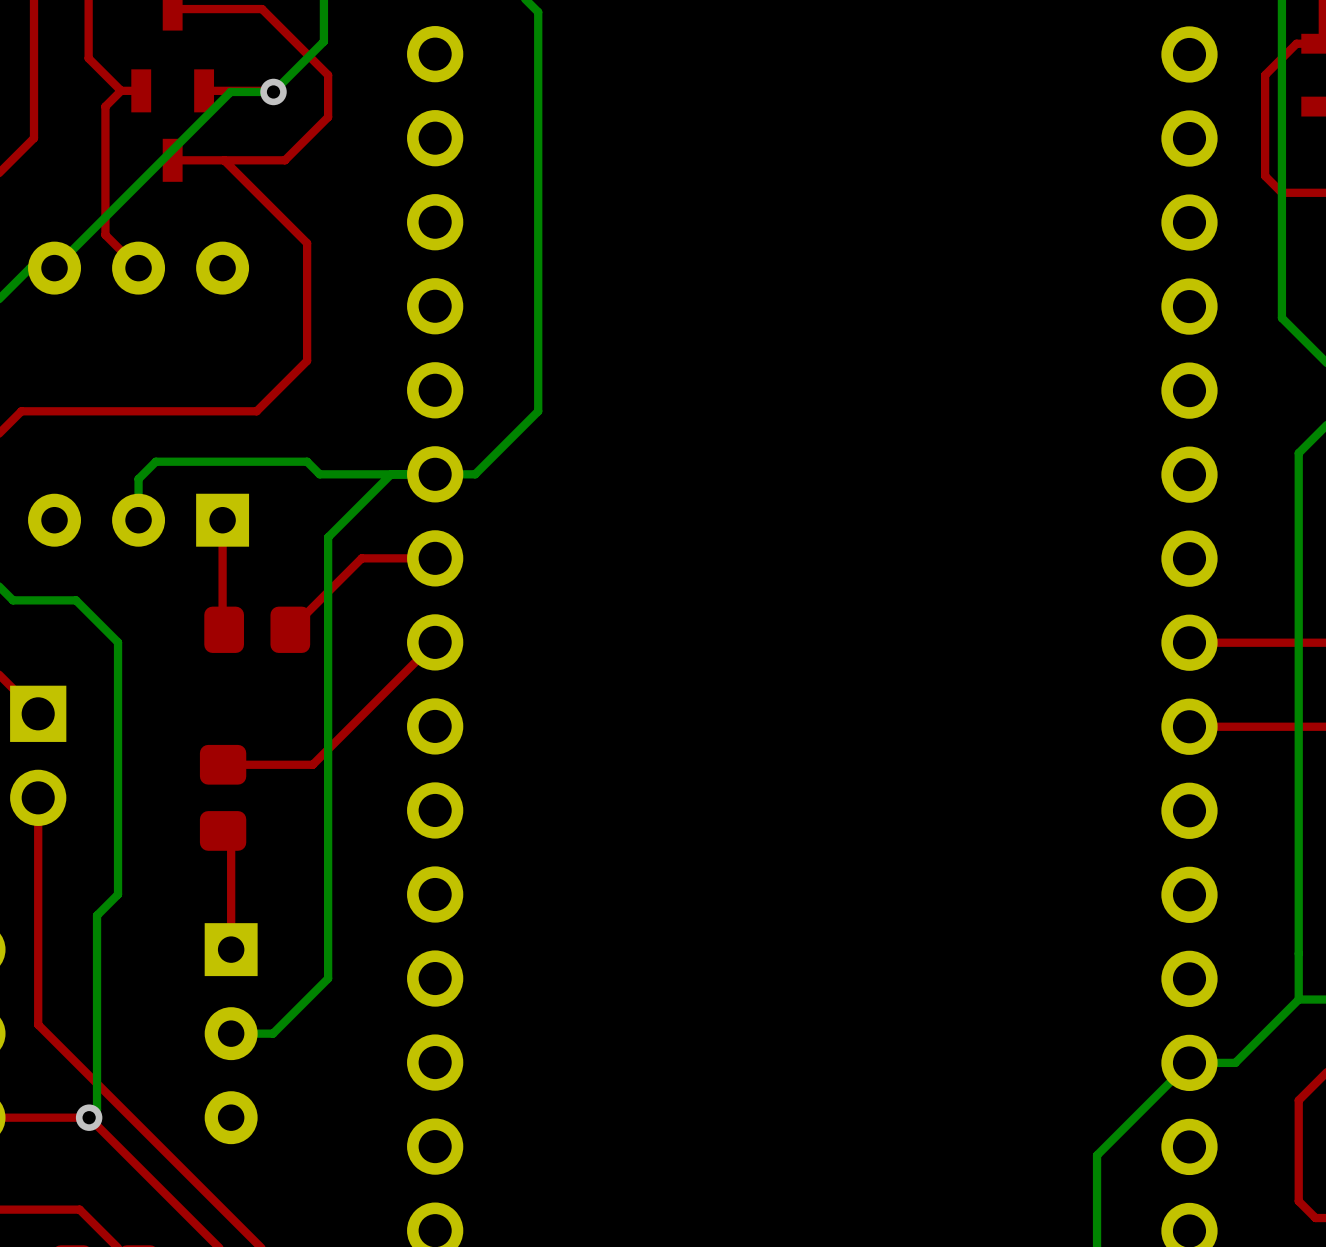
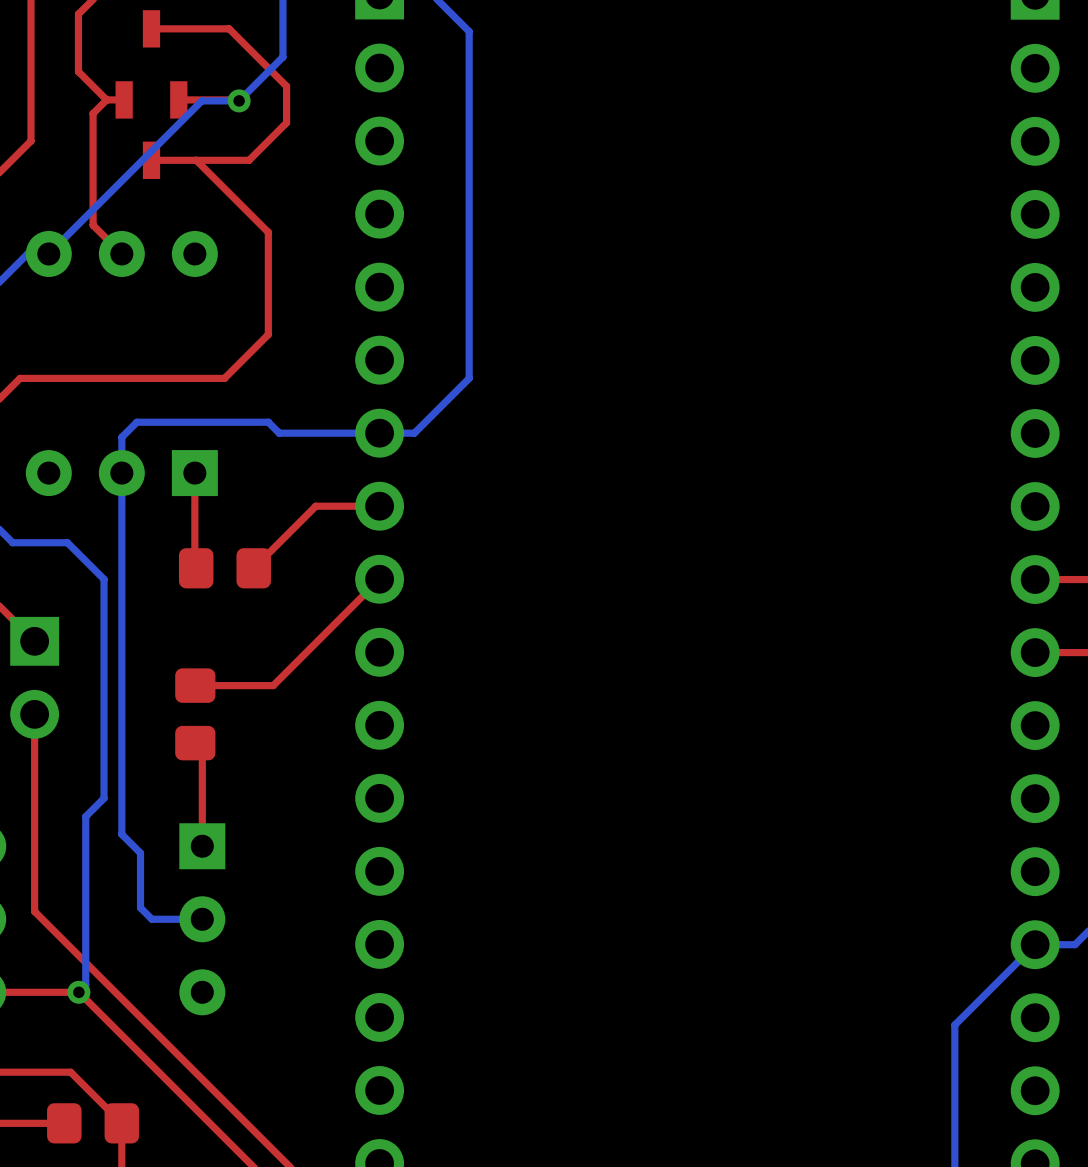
bottom track: (391, 474) (328, 537) (328, 978) (273, 1033) (231, 1033) -> (121, 473) (121, 834) (140, 853) (140, 907) (151, 919) (202, 919)

